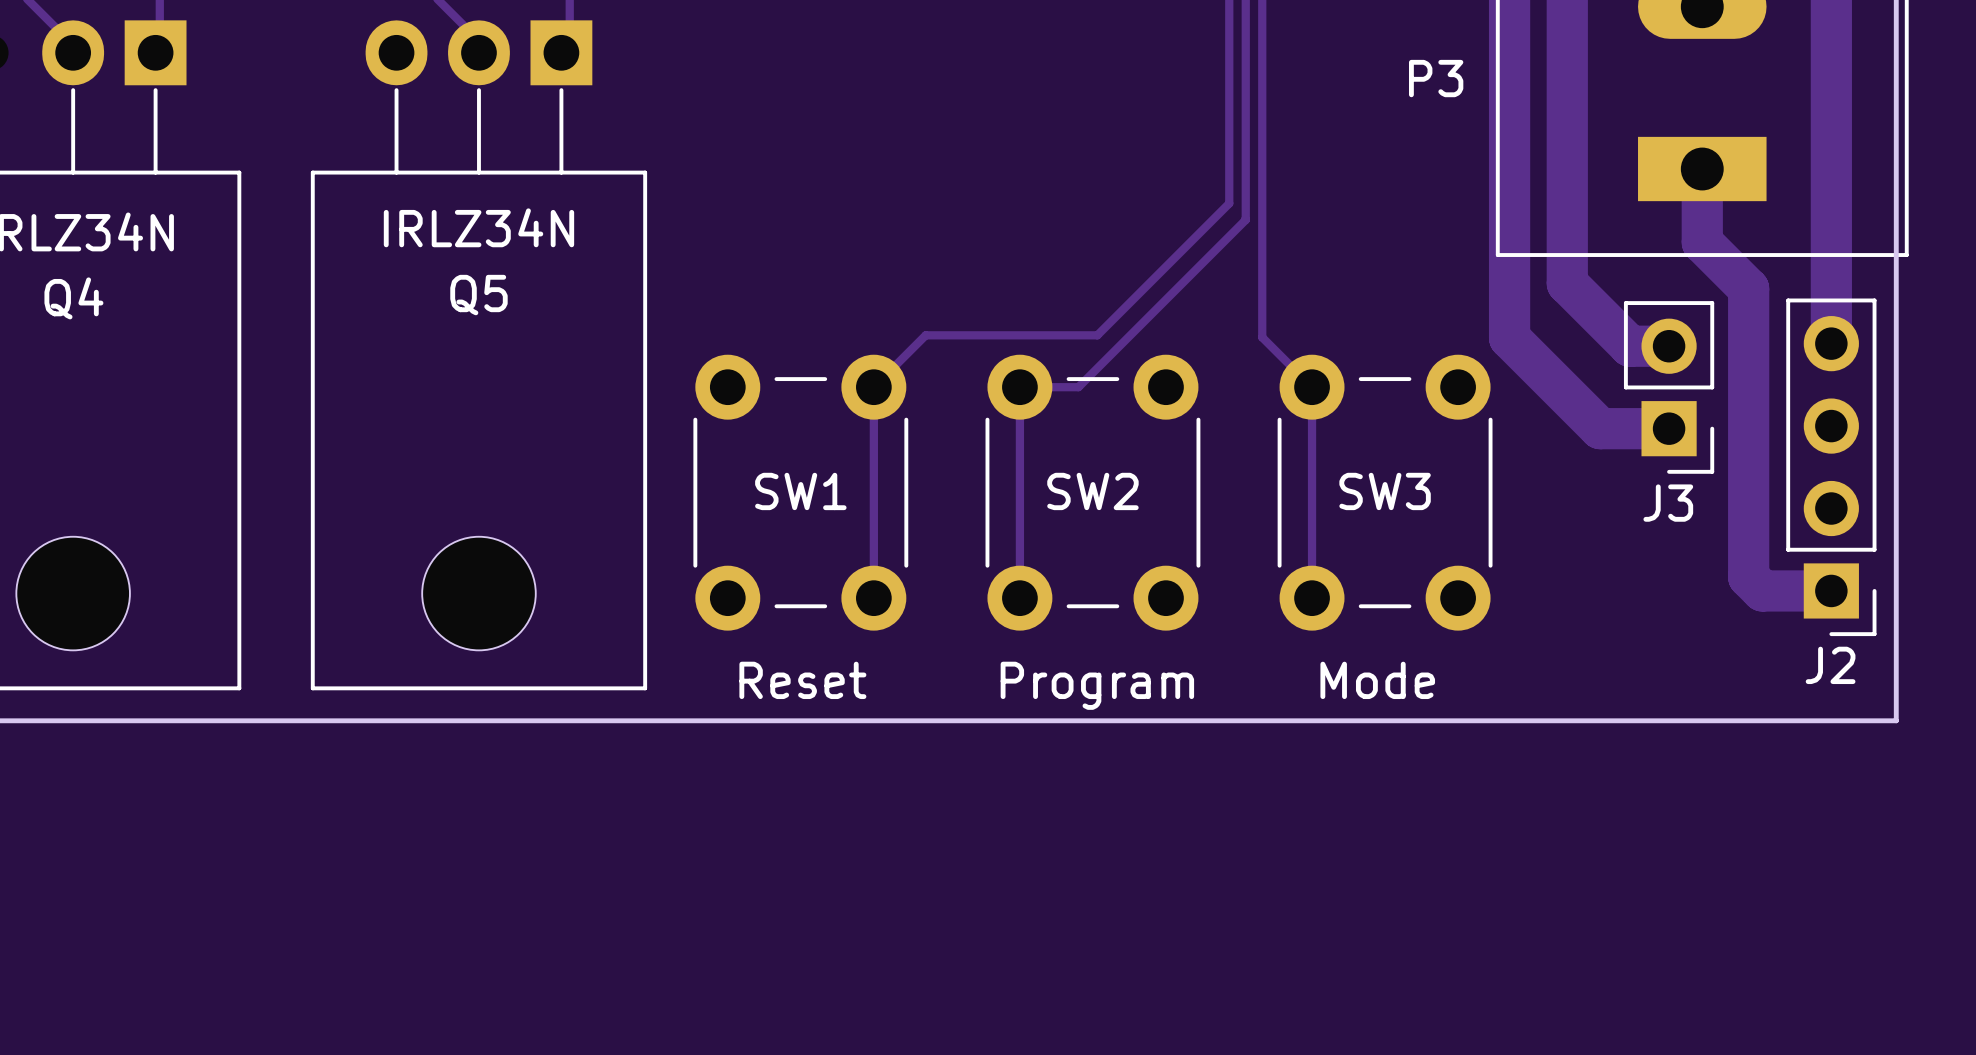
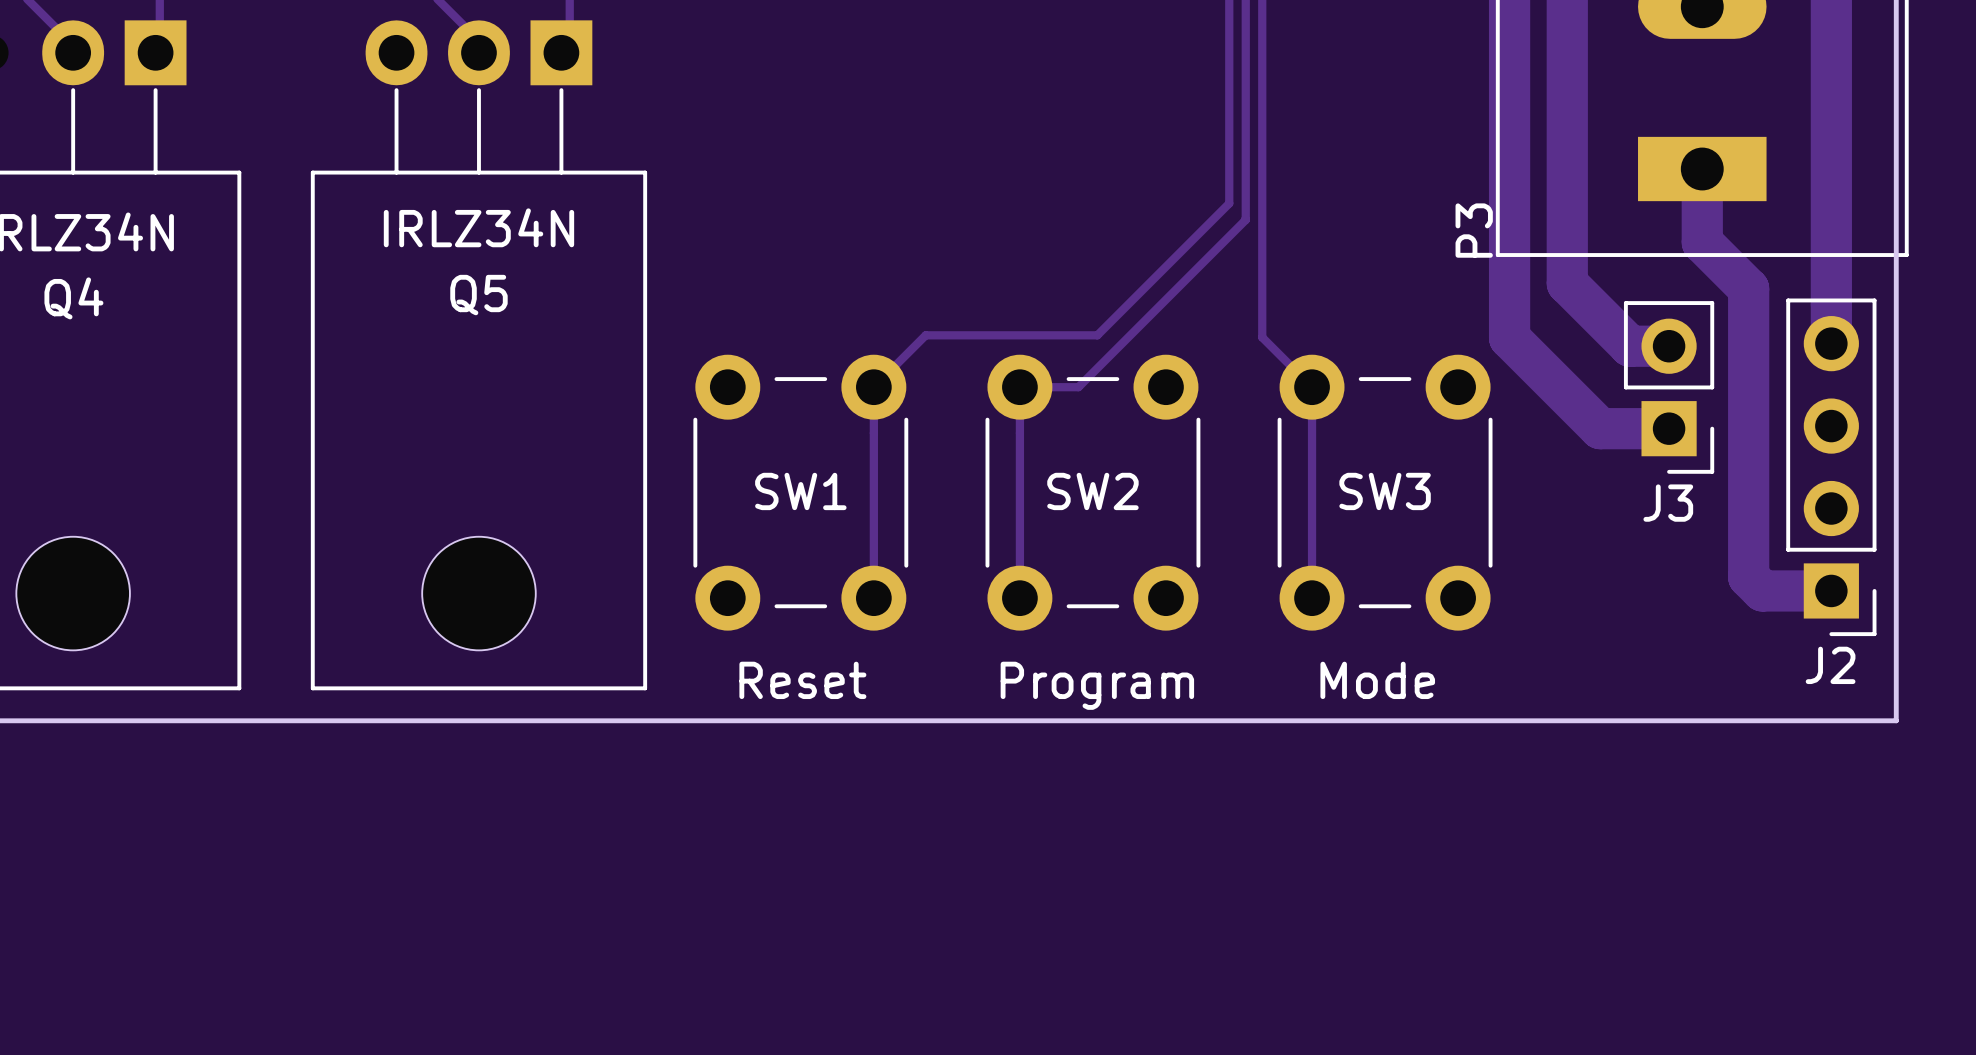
P3 name rotation: 0° (1436, 78) -> 90° counterclockwise (1474, 230)
P3 name position: P3 (1436, 78) -> P3 (1474, 230)

